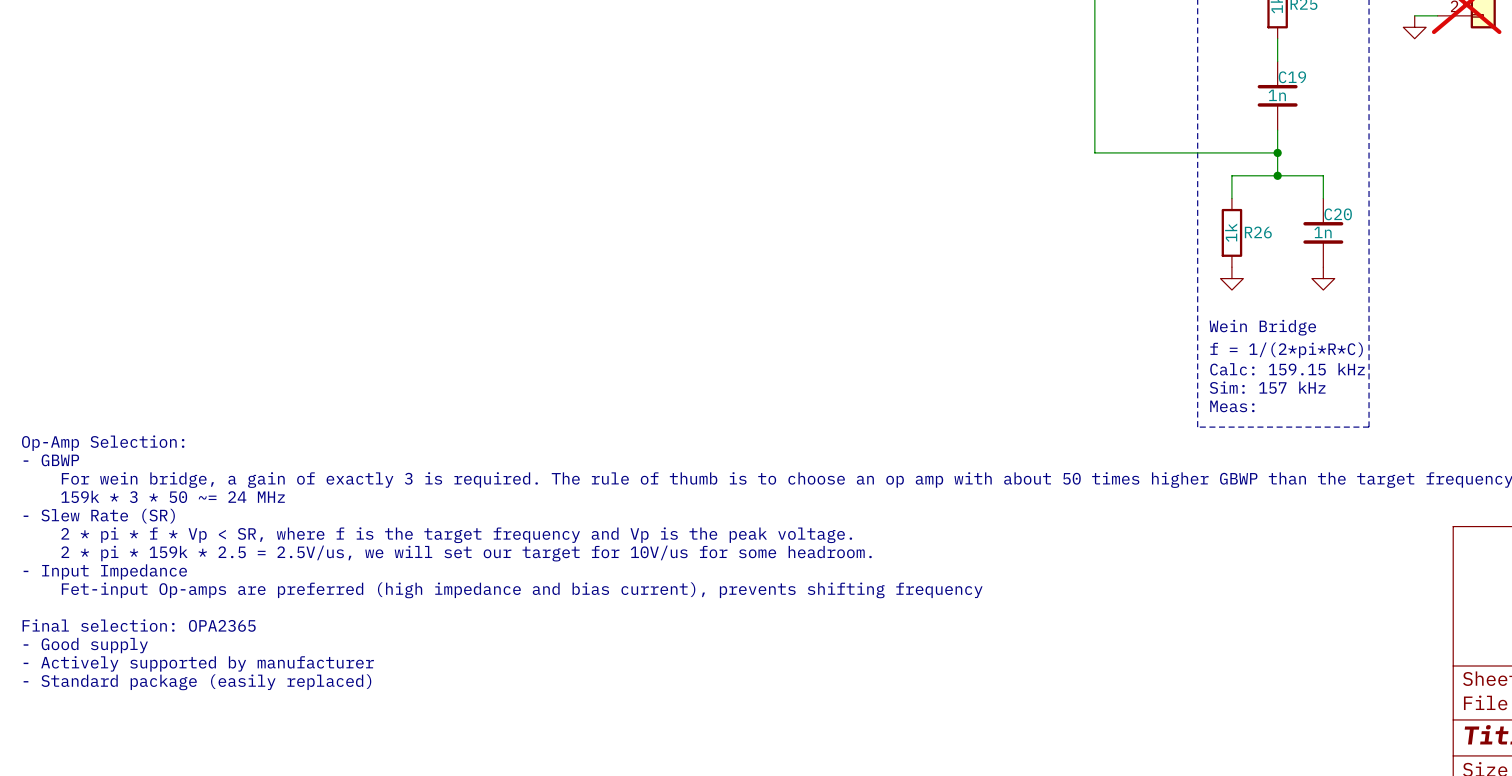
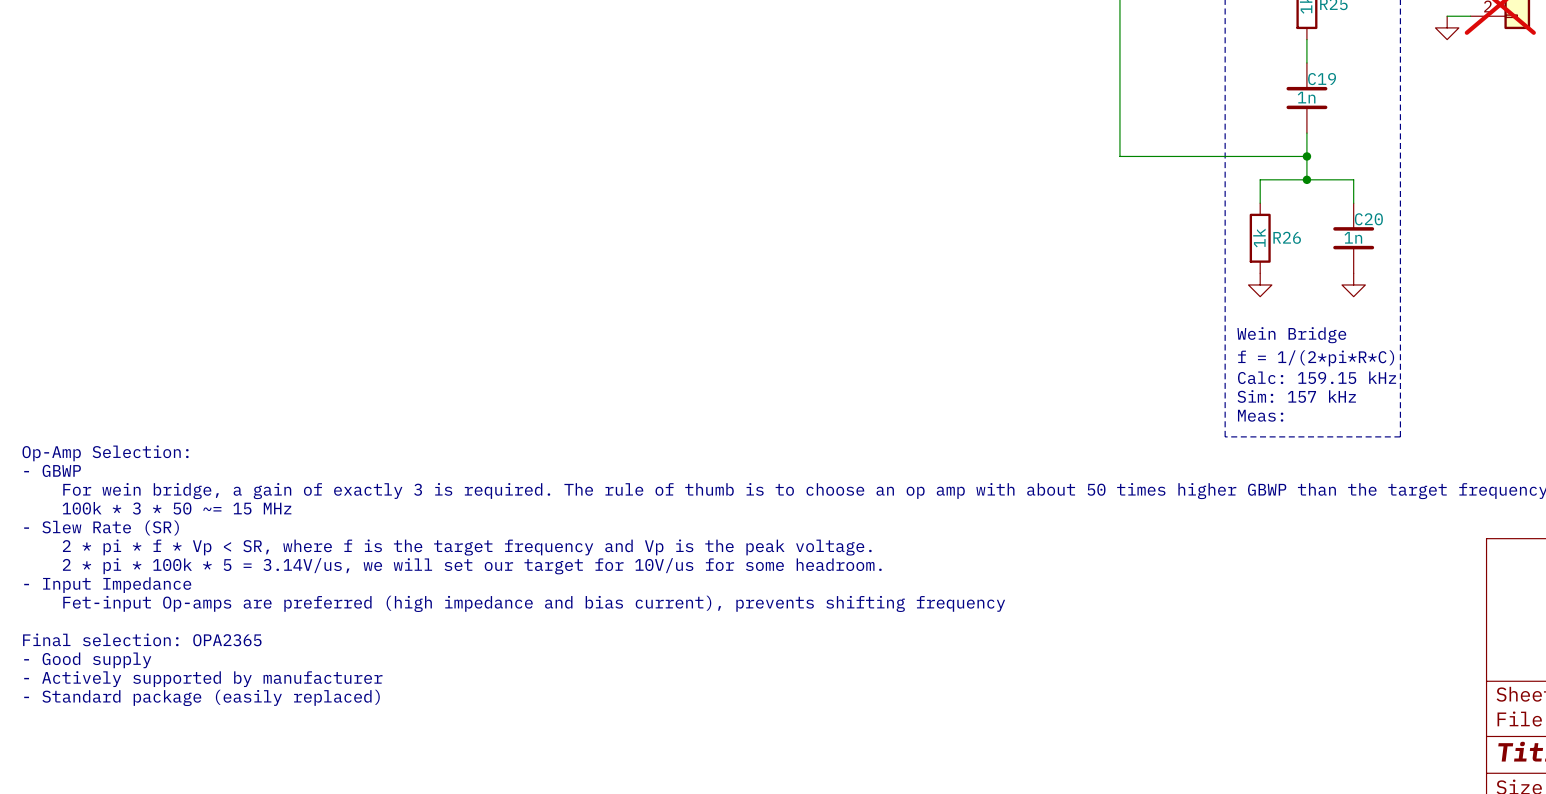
text: 159k * 3 * 50 ~= 24 MHz (173, 496) -> 100k * 3 * 50 ~= 15 MHz (177, 508)
text: 2 * pi * 159k * 2.5 = 2.5V/us, we will set our target for 10V/us for some headroom. (466, 553) -> 2 * pi * 100k * 5 = 3.14V/us, we will set our target for 10V/us for some headroom. (472, 566)

